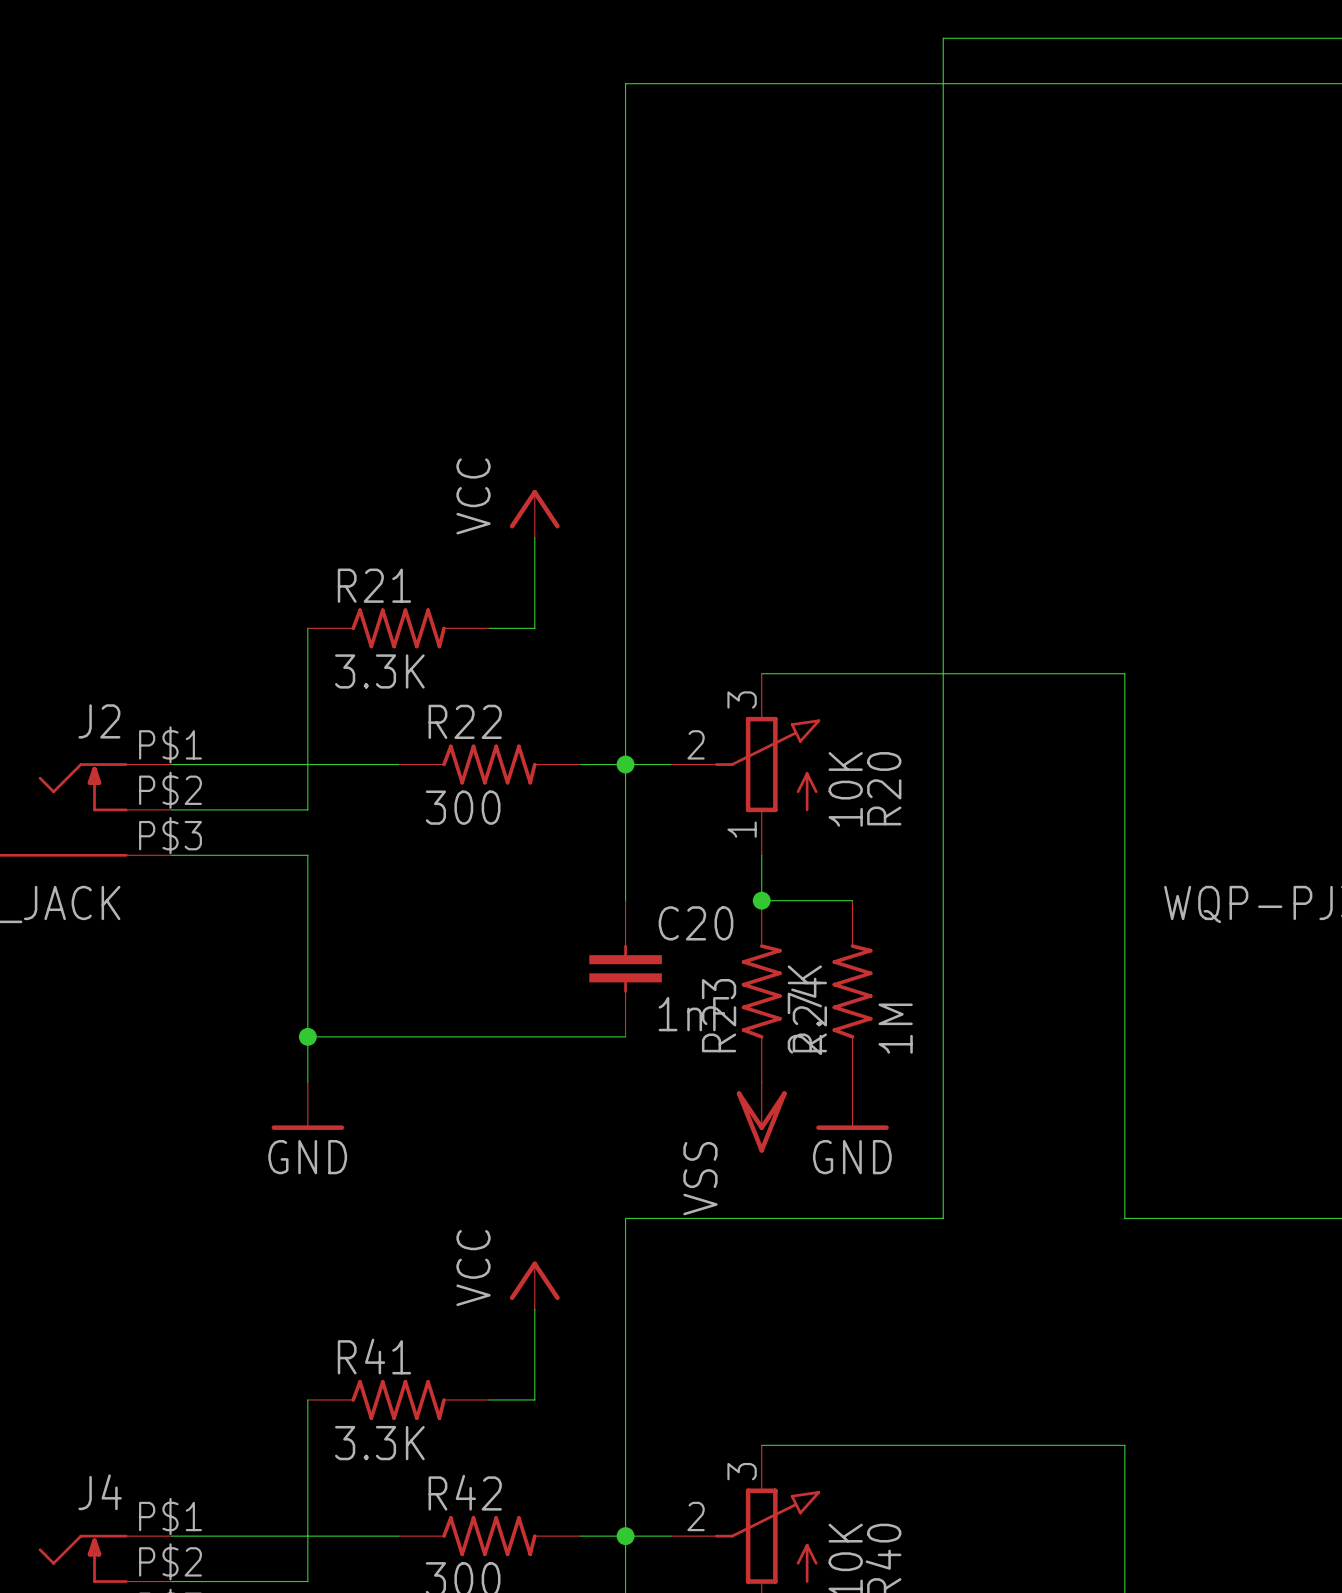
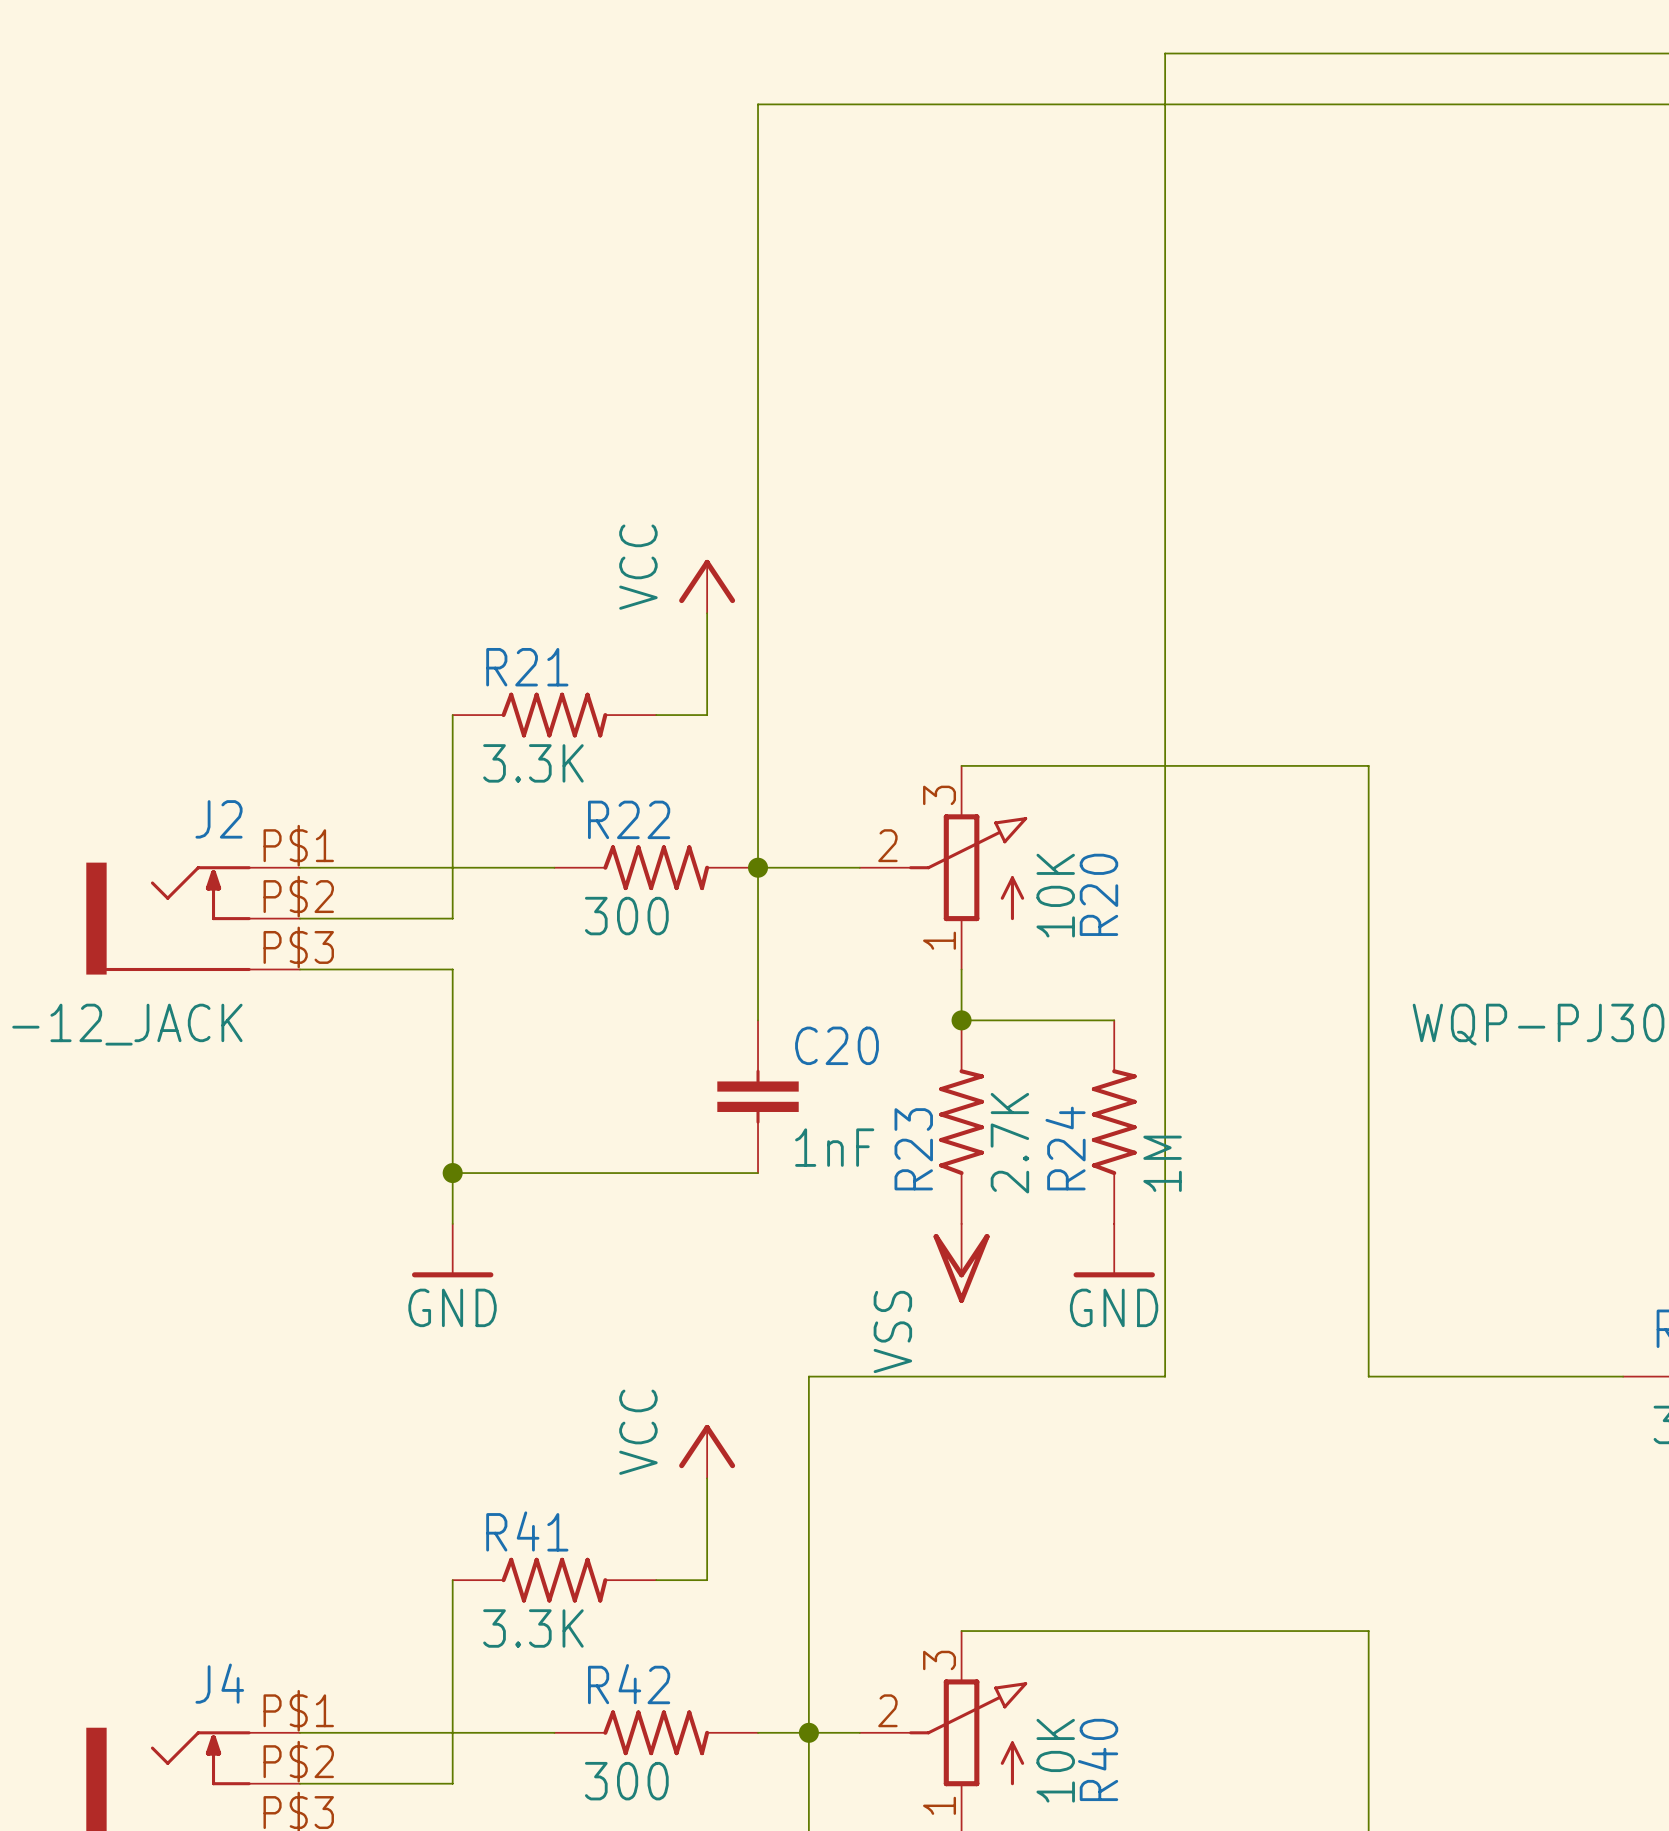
wire: (625, 83) (625, 900) -> (808, 104) (758, 104) (758, 1020)
junction position: (625, 764) -> (758, 867)
C20 position: (625, 968) -> (758, 1096)
R24 position: (852, 991) -> (1114, 1122)
wire: (580, 1036) (625, 1036) -> (1063, 1020) (1114, 1020)
power symbol position: GND (852, 1106) -> GND (1114, 1250)

